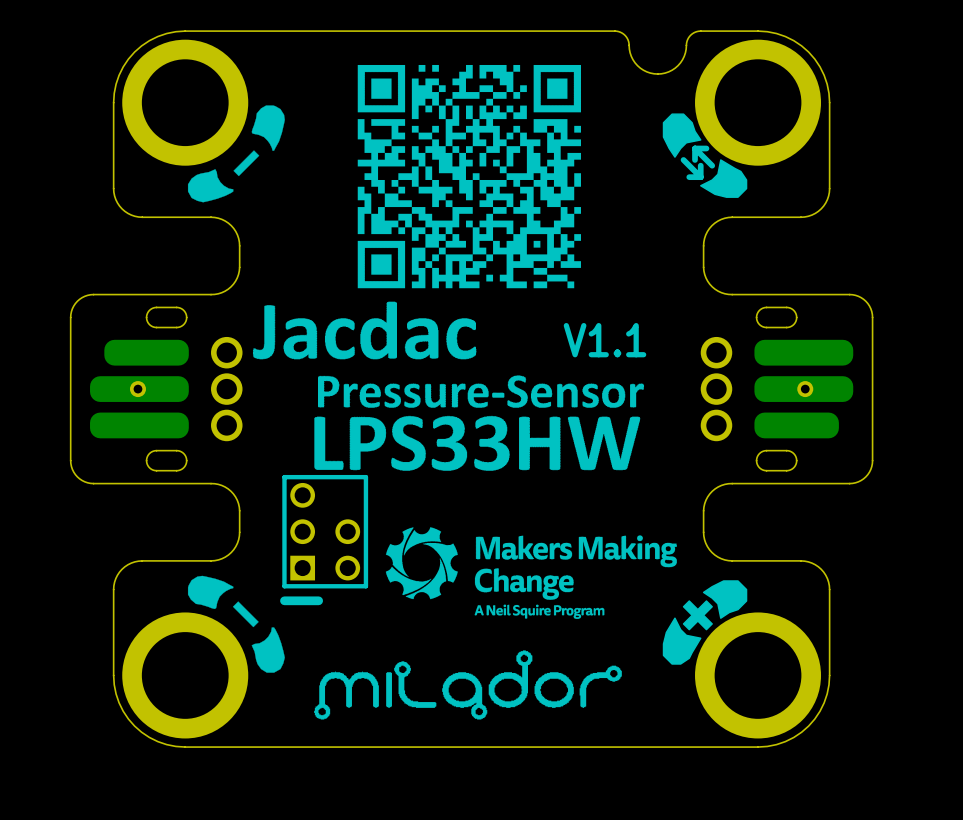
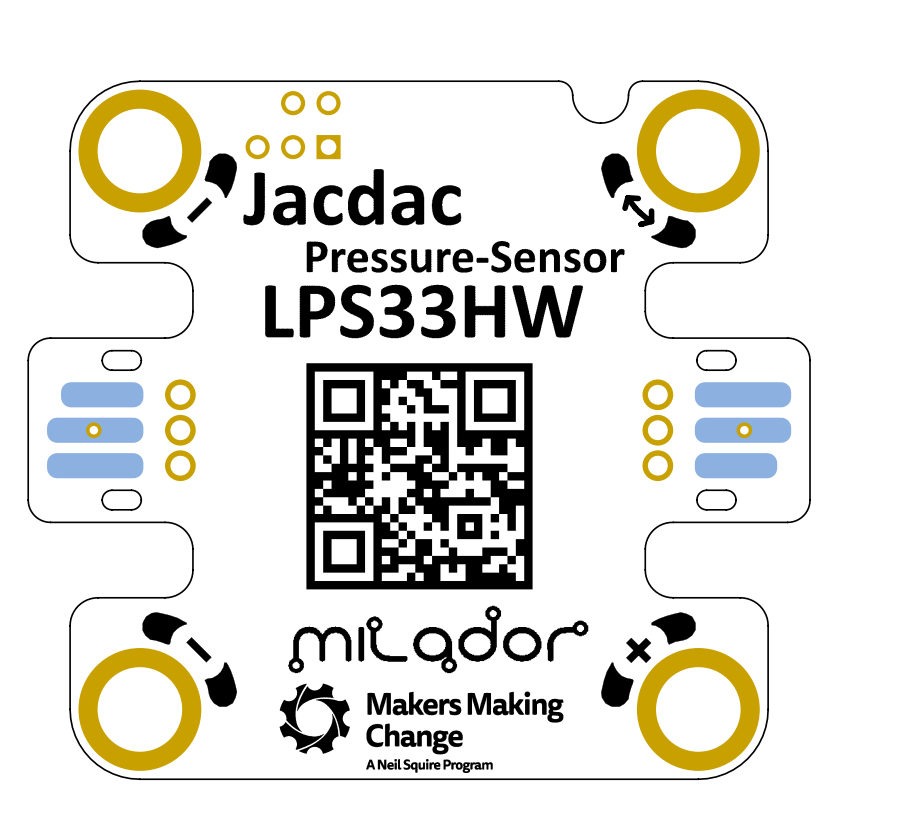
part footprint: [662, 39, 822, 198] -> [601, 89, 760, 249]
drawing: [357, 64, 581, 289] -> none
part: none -> (293, 125)
drawing: none -> [306, 363, 533, 590]
text: V1.1 (605, 340) -> none
drawing position: (448, 354) -> (433, 220)
drawing position: (477, 443) -> (424, 311)
part: (324, 540) -> none
drawing position: (531, 573) -> (421, 728)
part footprint: [662, 580, 822, 739] -> [601, 612, 760, 771]
drawing position: (467, 684) -> (438, 639)

